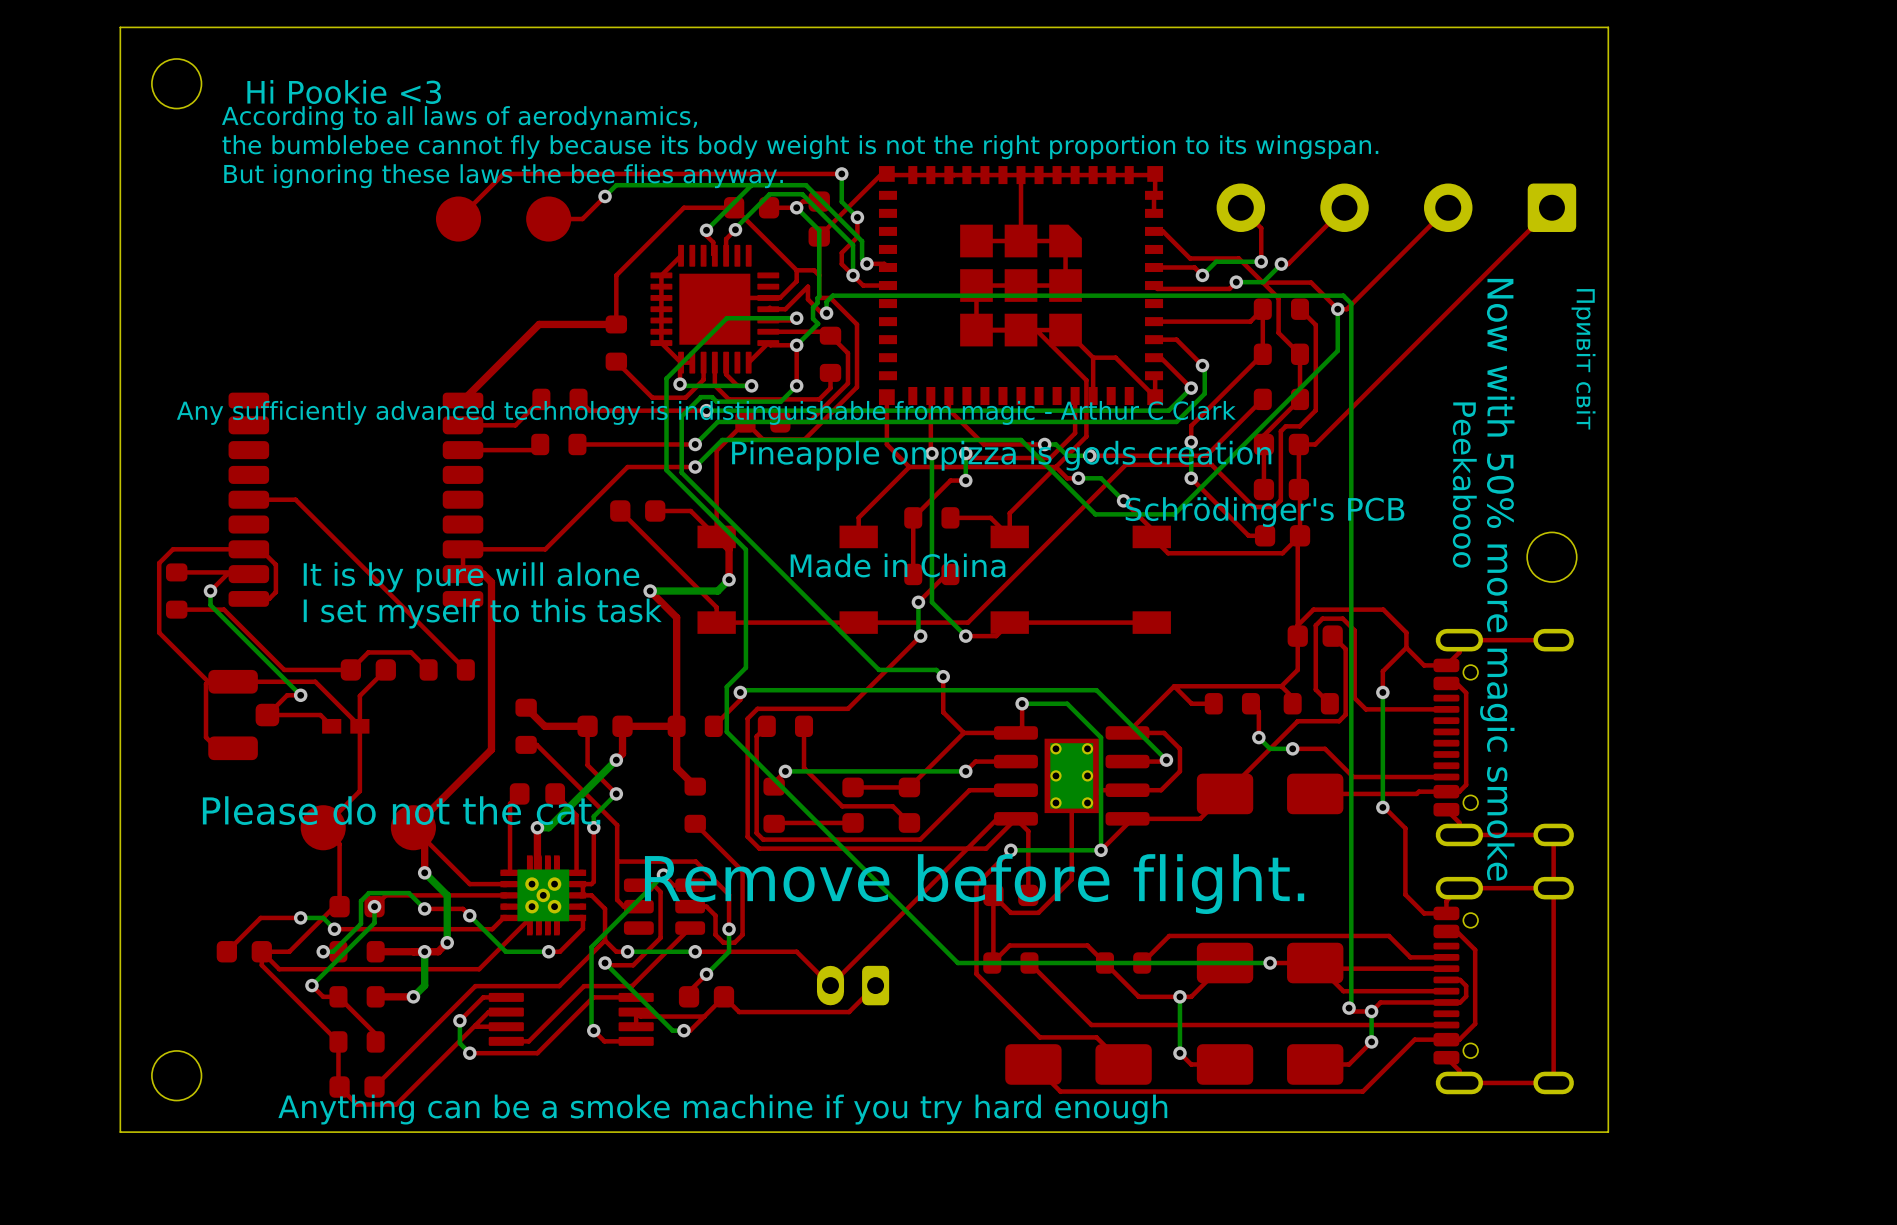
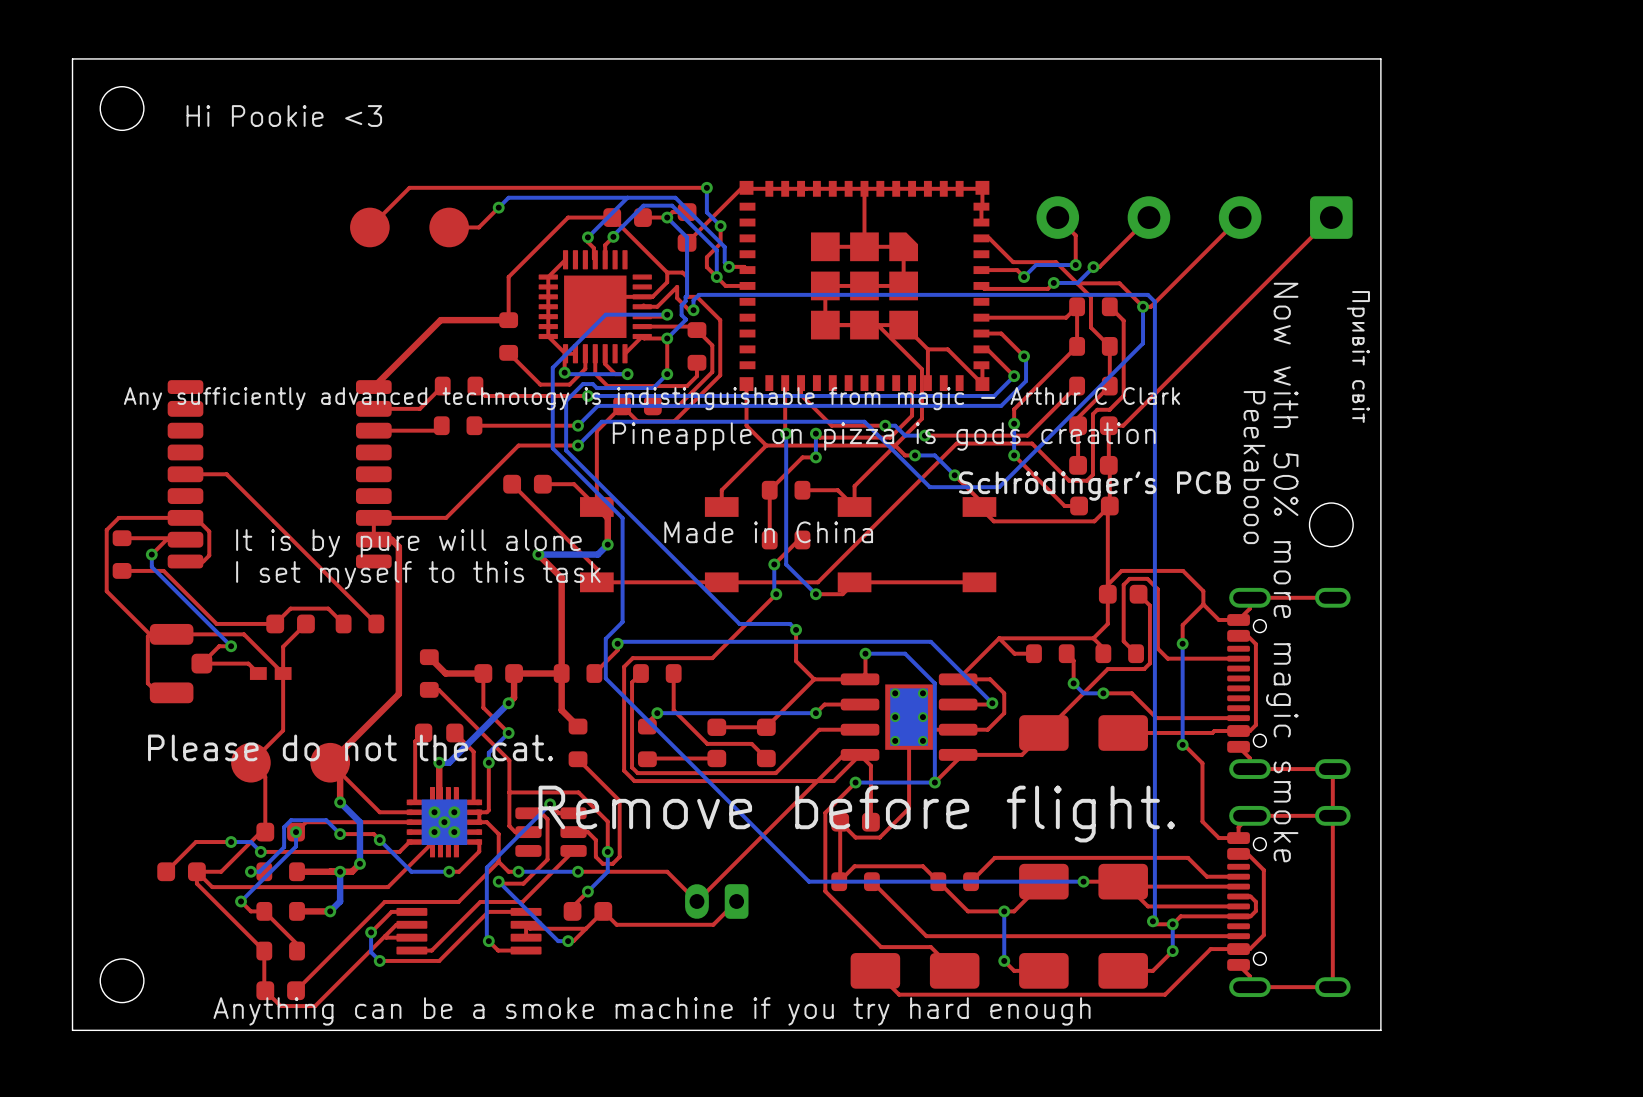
text: According to all laws of aerodynamics, (459, 118) -> none
text: the bumblebee cannot fly because its body weight is not the right proportion to its wingspan. (800, 147) -> none
text: But ignoring these laws the bee flies anyway. (503, 176) -> none

